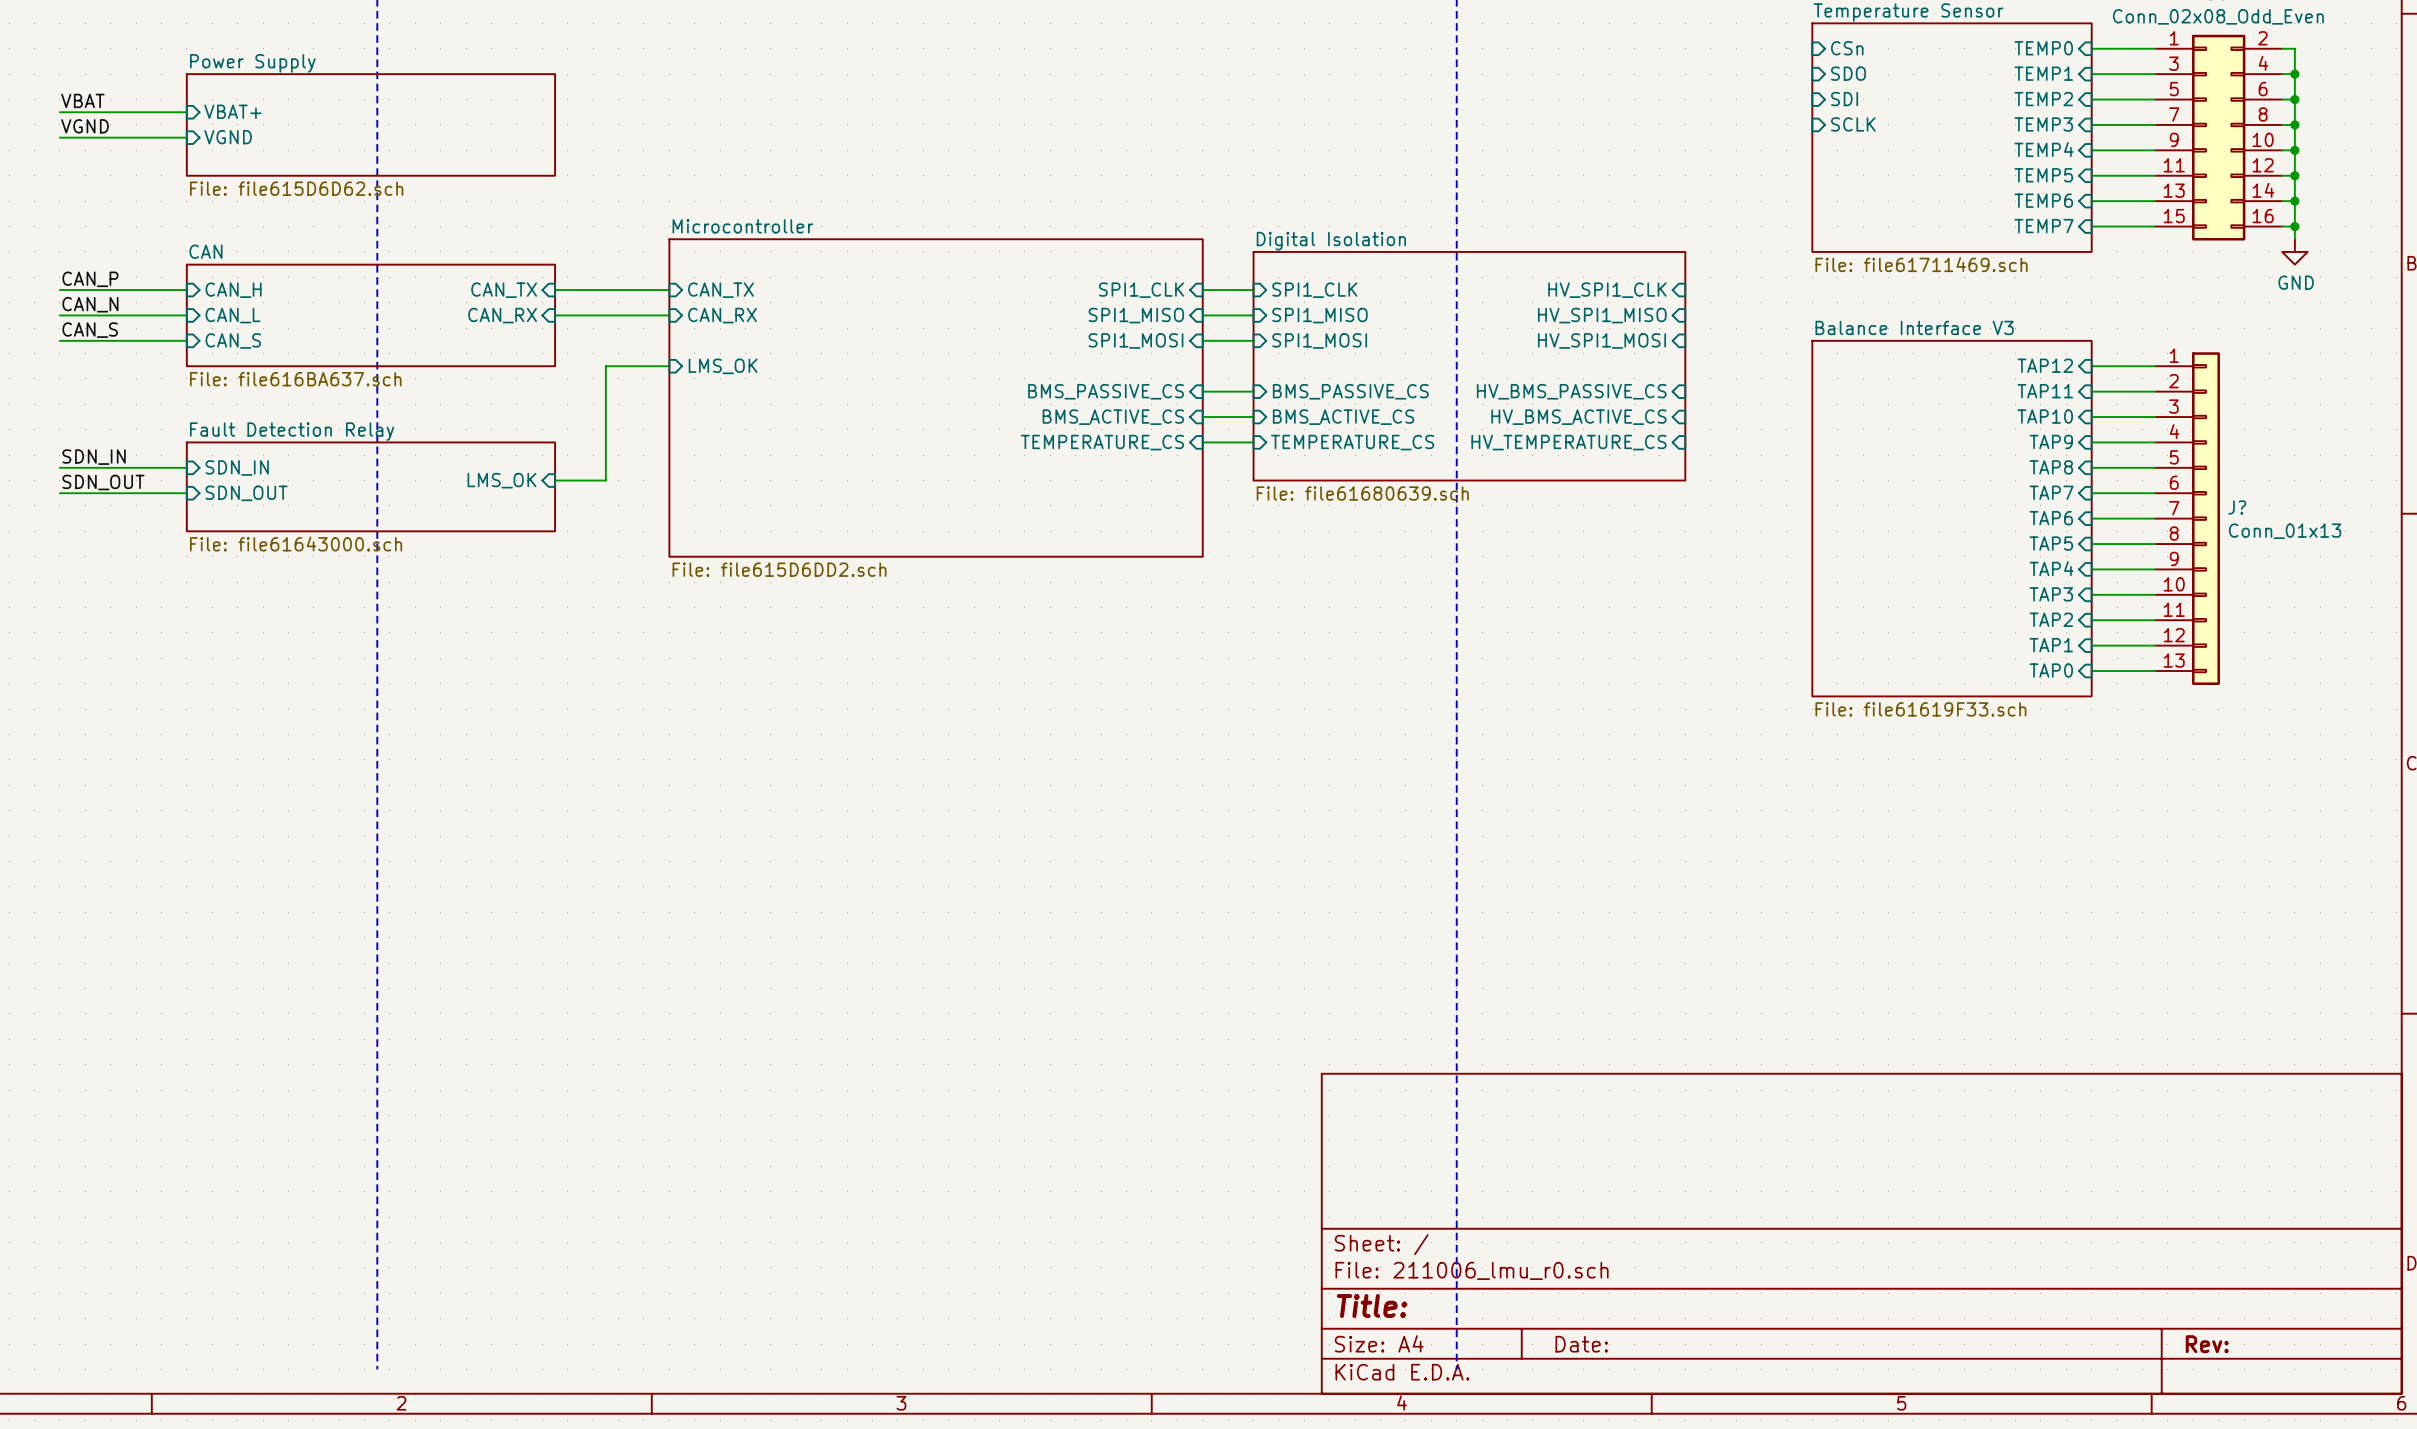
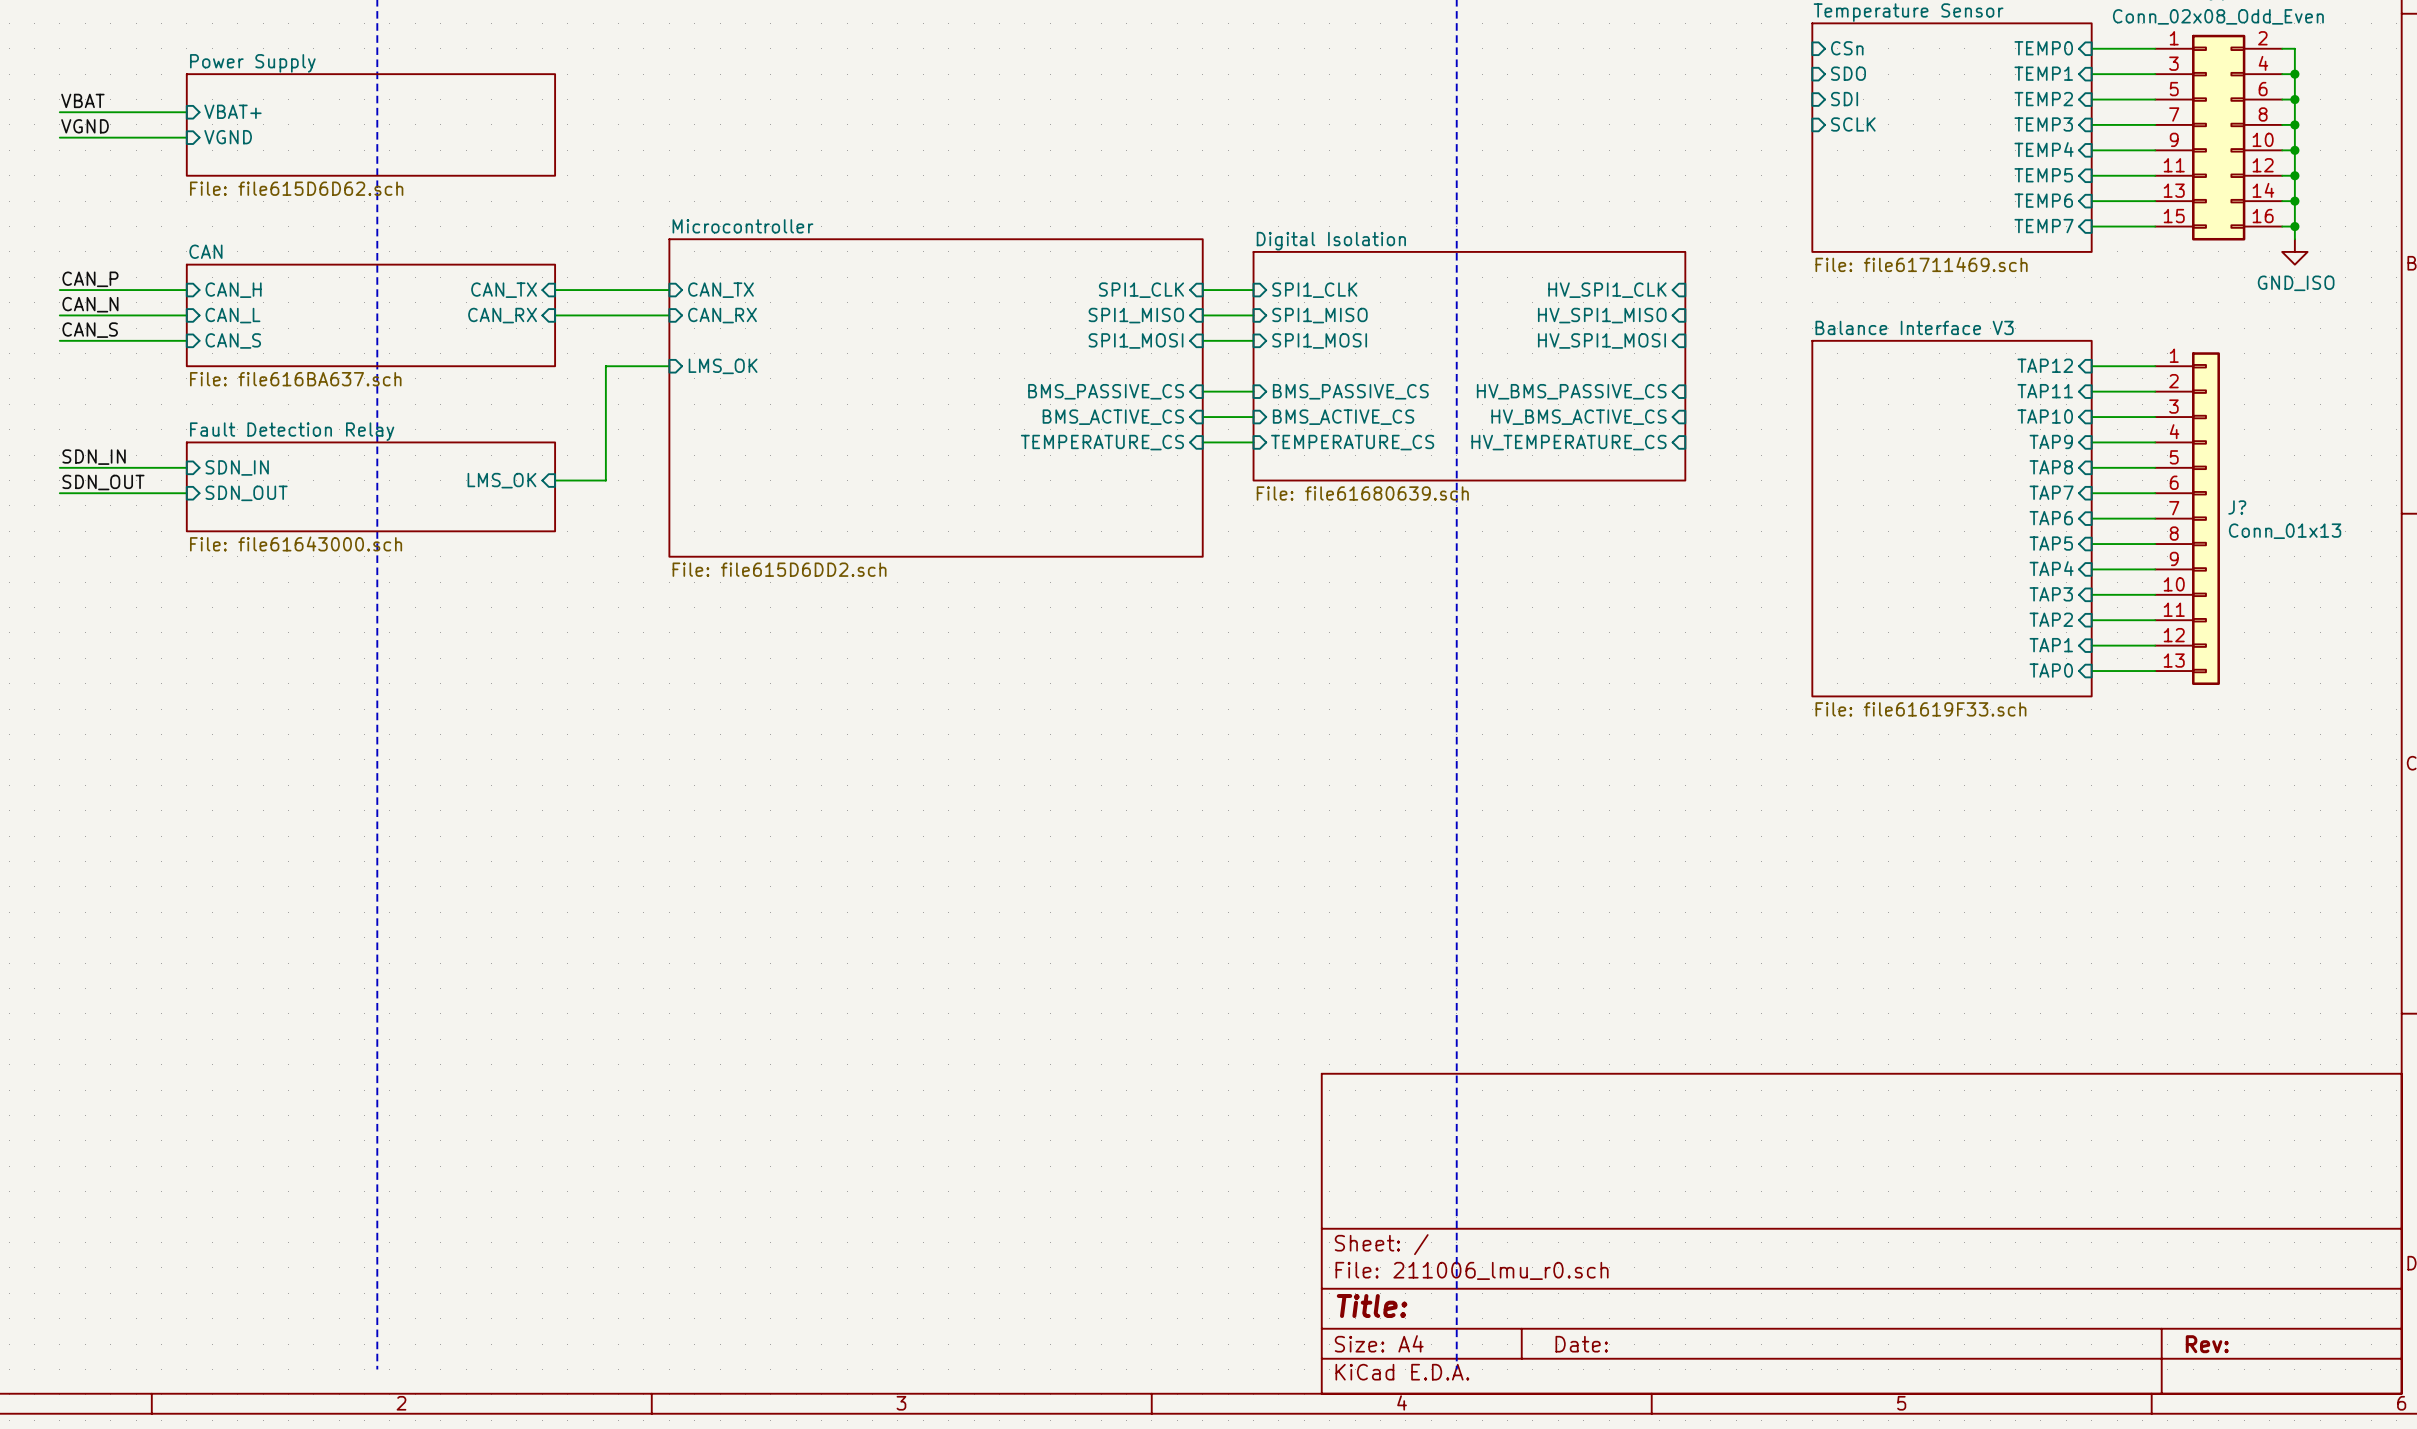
power symbol: GND (2294, 251) -> GND_ISO (2294, 251)

